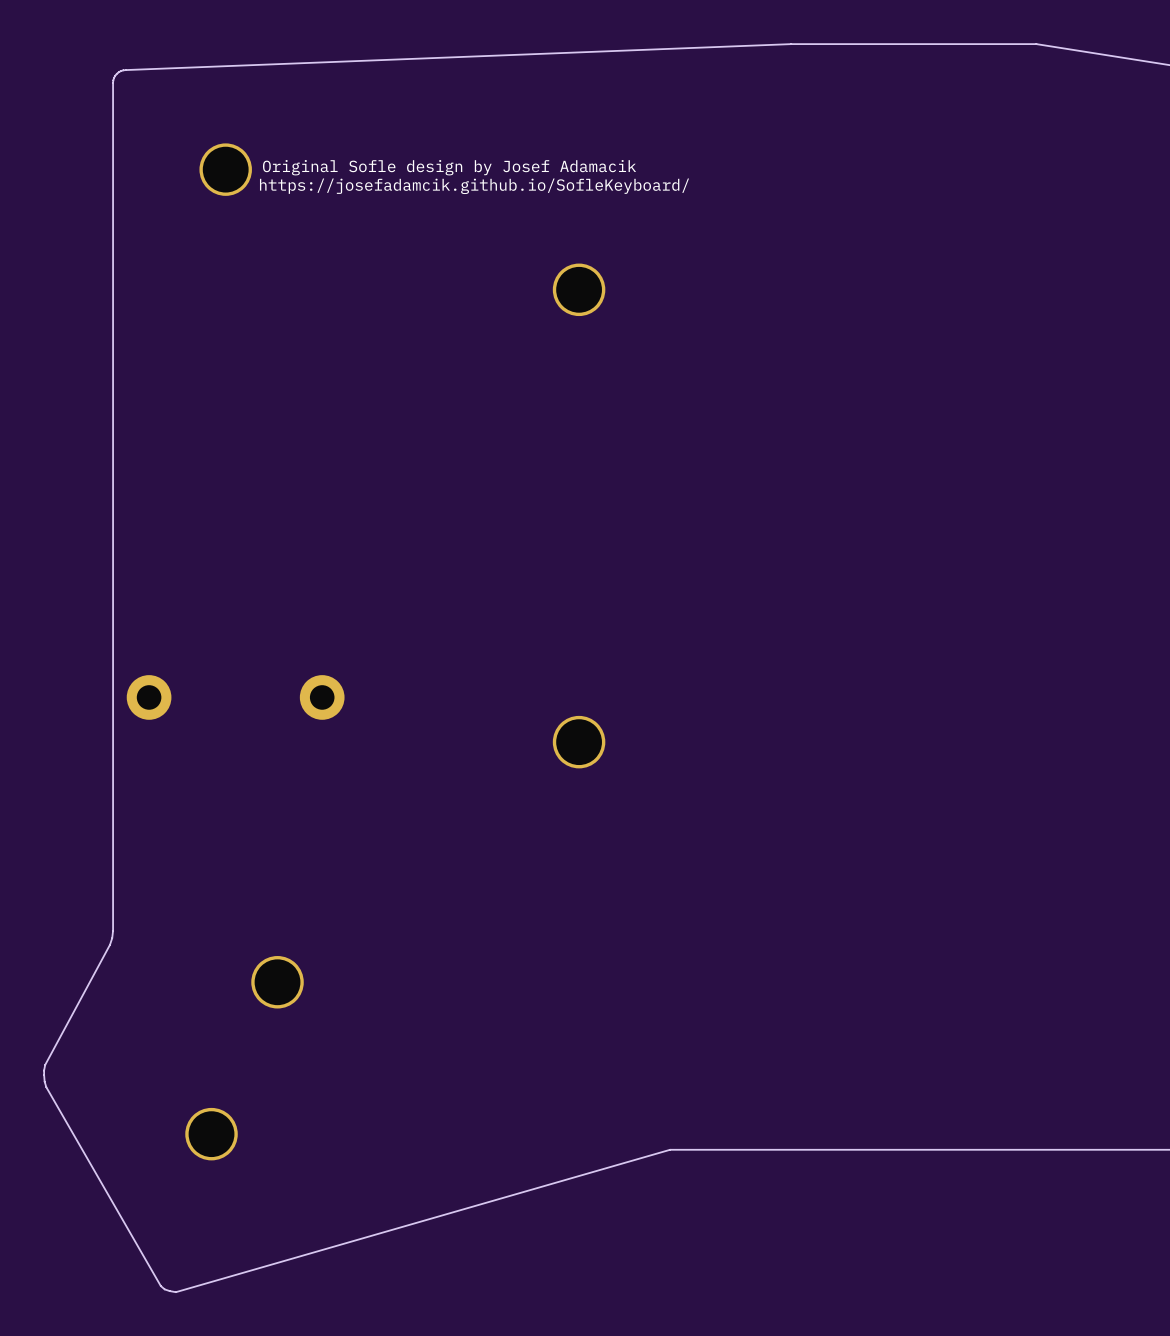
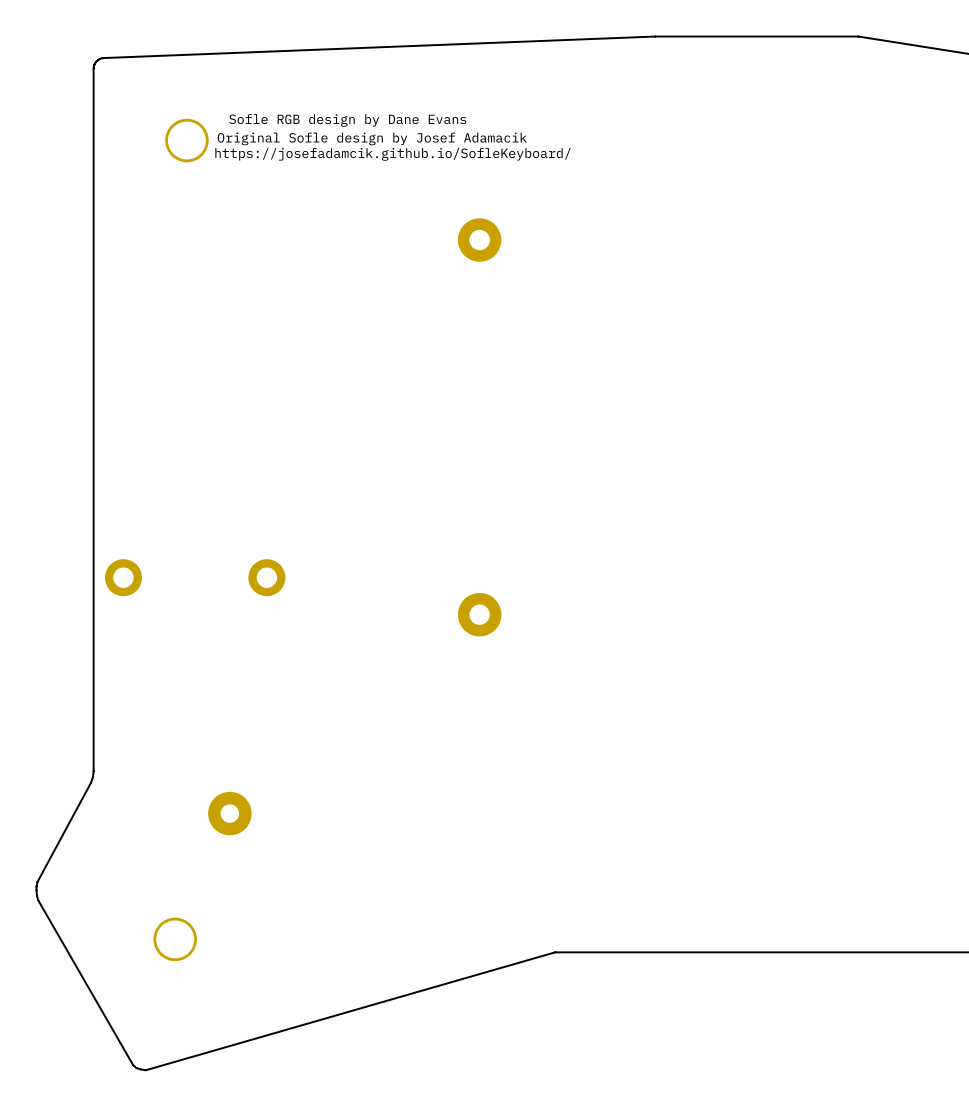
text: none -> Sofle RGB design by Dane Evans (347, 120)
part footprint: [552, 263, 606, 317] -> [457, 218, 502, 262]
part footprint: [552, 715, 606, 769] -> [457, 592, 502, 637]
part footprint: [251, 956, 304, 1009] -> [208, 791, 252, 836]

